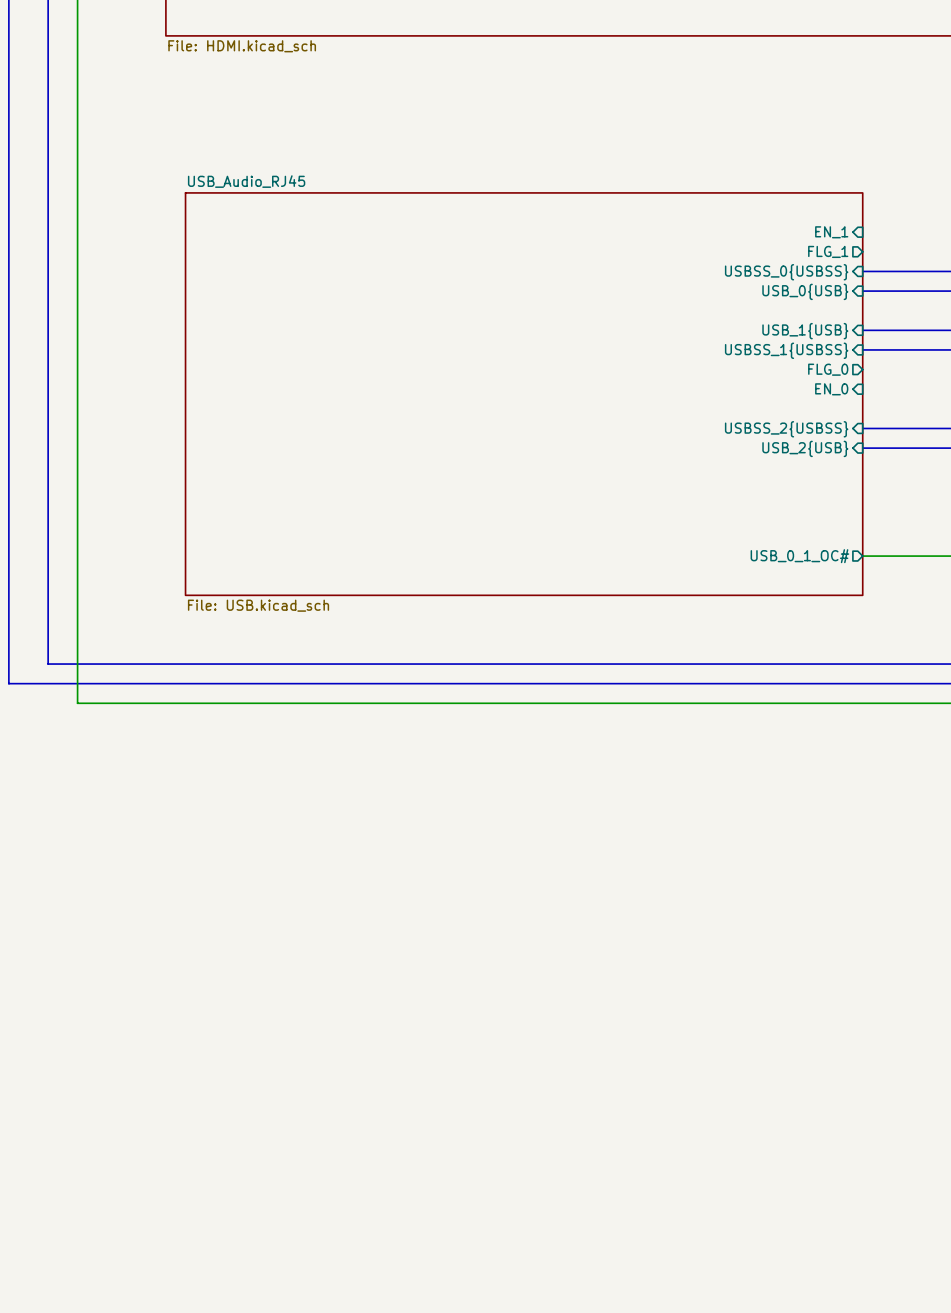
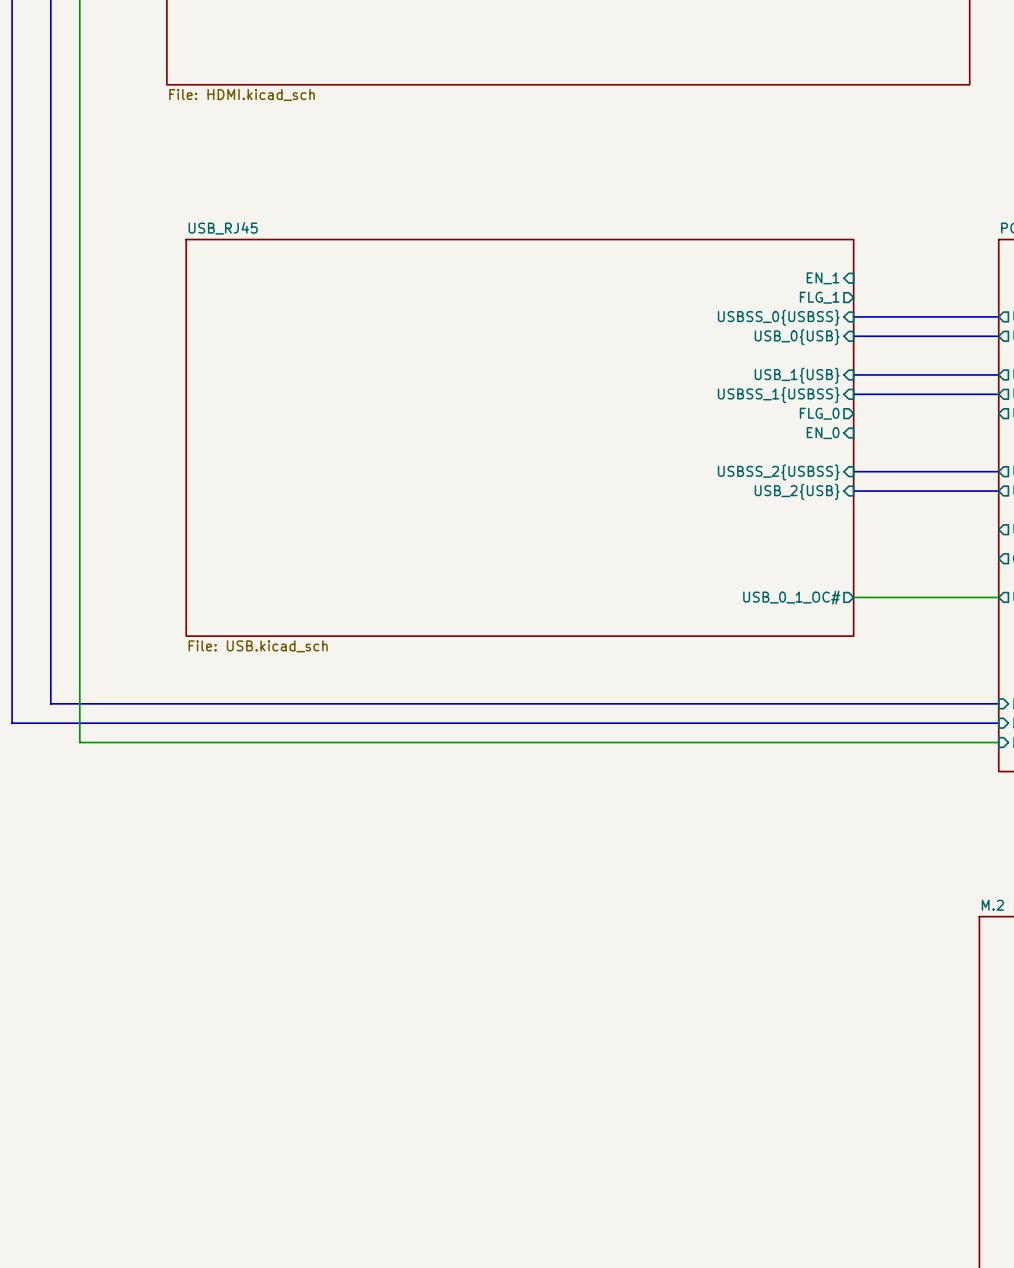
sheet USB_Audio_RJ45 name: USB_Audio_RJ45 (246, 181) -> USB_RJ45 (223, 228)

